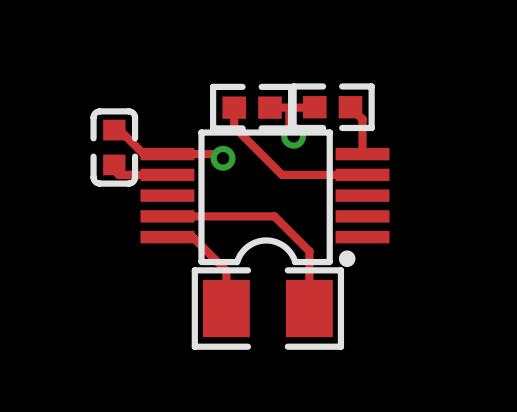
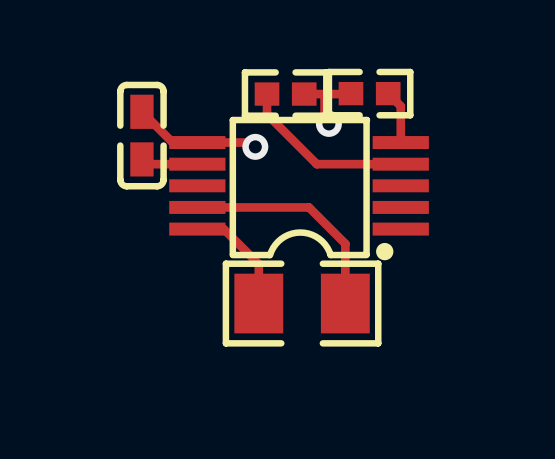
part footprint: [90, 108, 139, 187] -> [117, 81, 167, 190]

